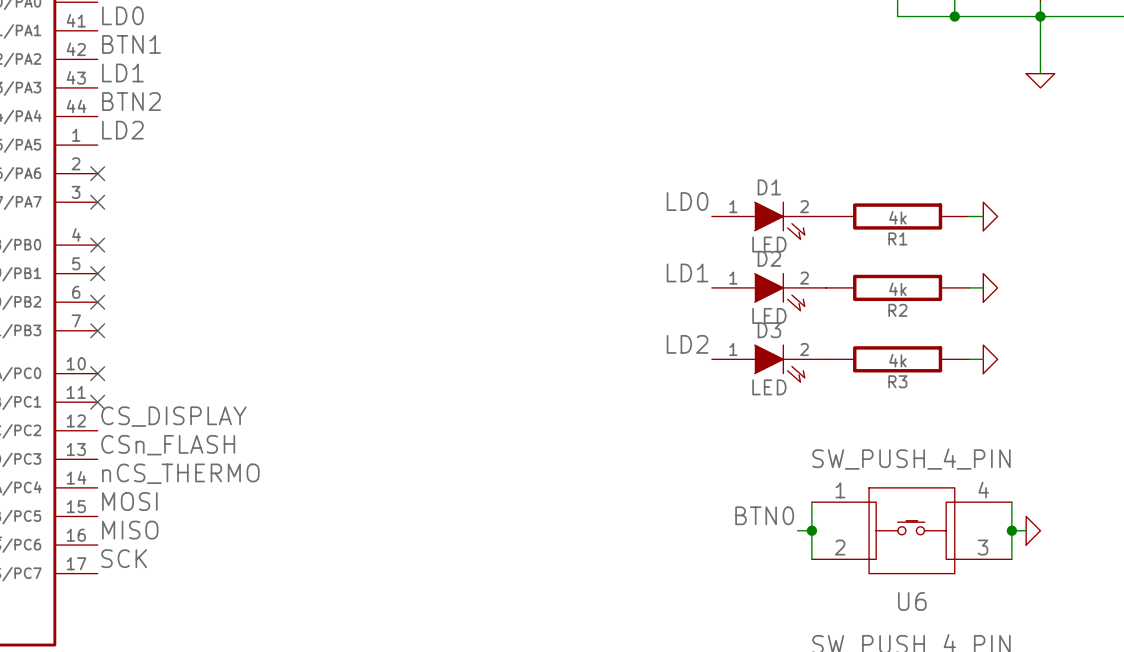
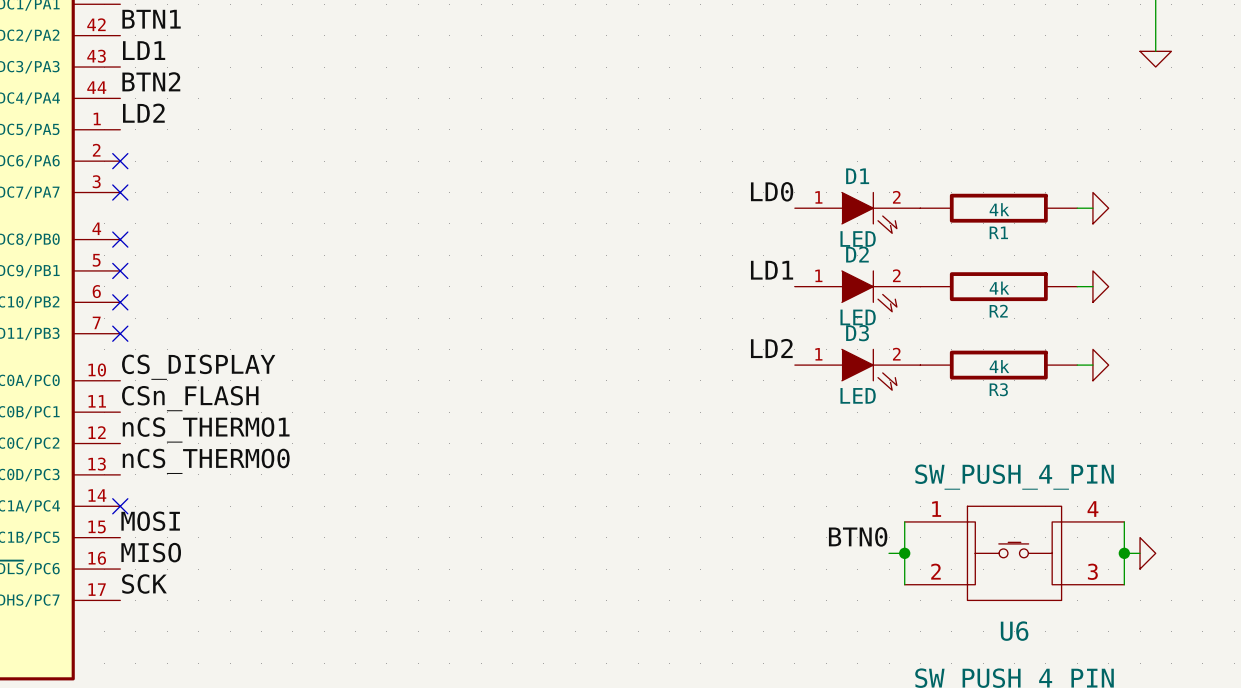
label: none -> CS_DISPLAY (198, 367)
no-connect mark: (97, 373) -> none
label: none -> CSn_FLASH (190, 398)
no-connect mark: (97, 402) -> none
label: CS_DISPLAY (173, 416) -> nCS_THERMO1 (206, 429)
label: CSn_FLASH (168, 445) -> nCS_THERMO0 (206, 461)
label: nCS_THERMO (180, 473) -> none
no-connect mark: none -> (120, 506)

